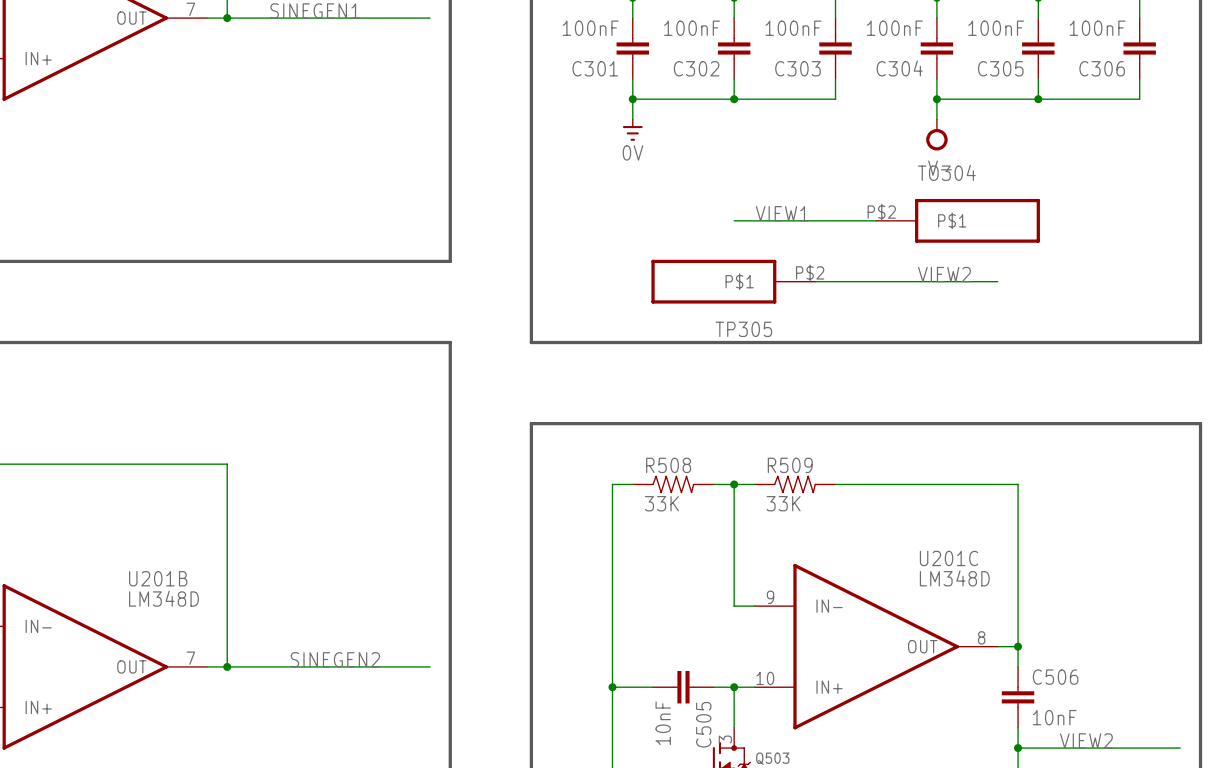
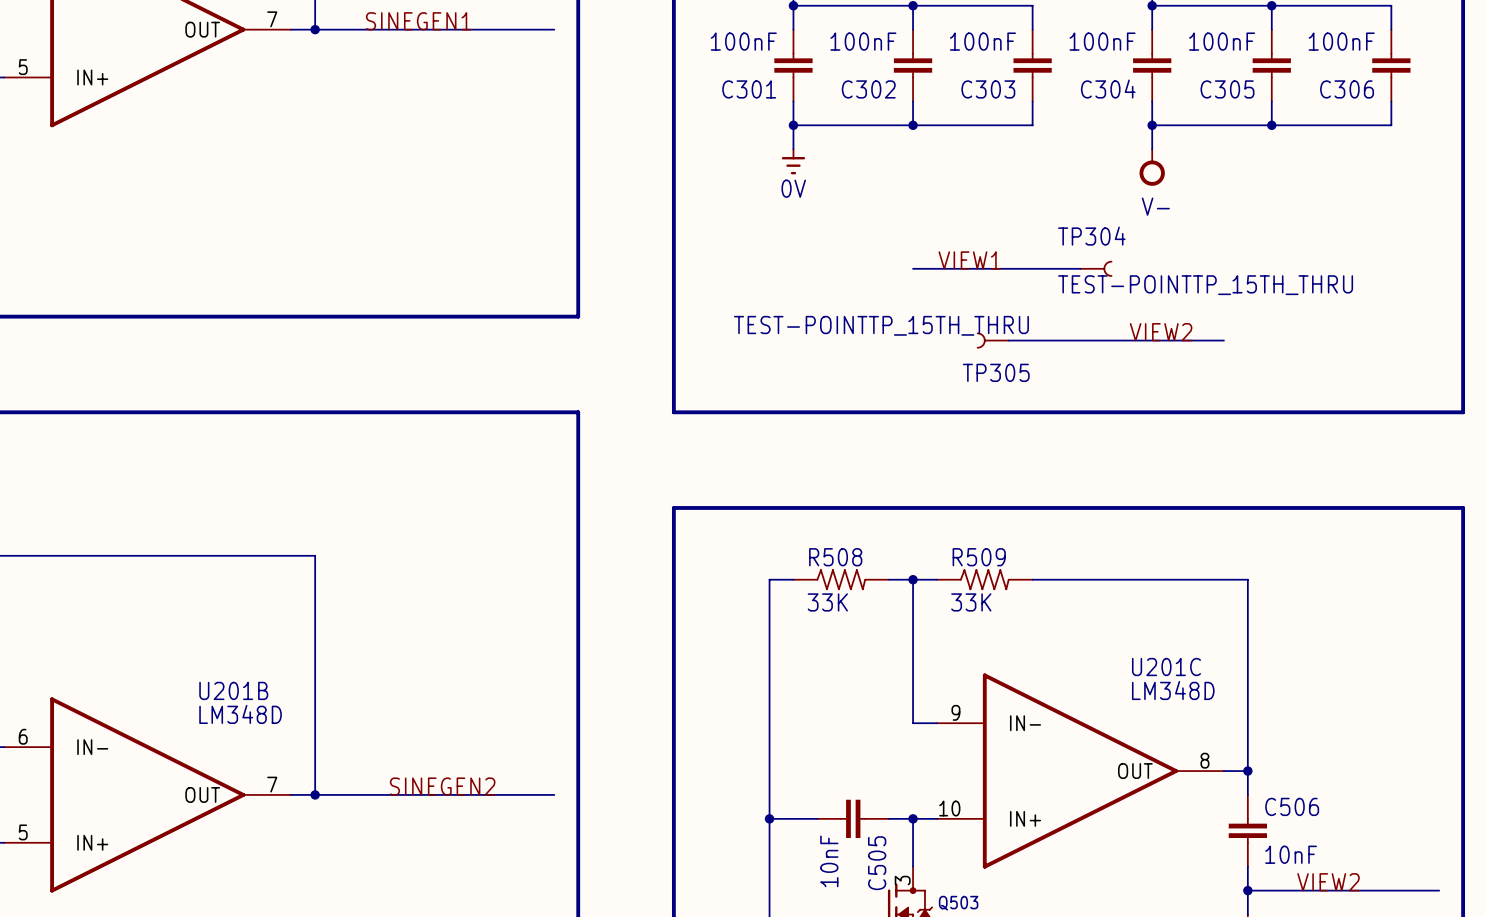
TP304: none -> TEST-POINTTP_15TH_THRU (1095, 268)
TO304: (958, 220) -> none
TP305 symbol: [651, 259, 816, 304] -> [976, 332, 1010, 349]
TP305 value: none -> TEST-POINTTP_15TH_THRU (881, 325)
TP305 name position: TP305 (743, 329) -> TP305 (996, 372)

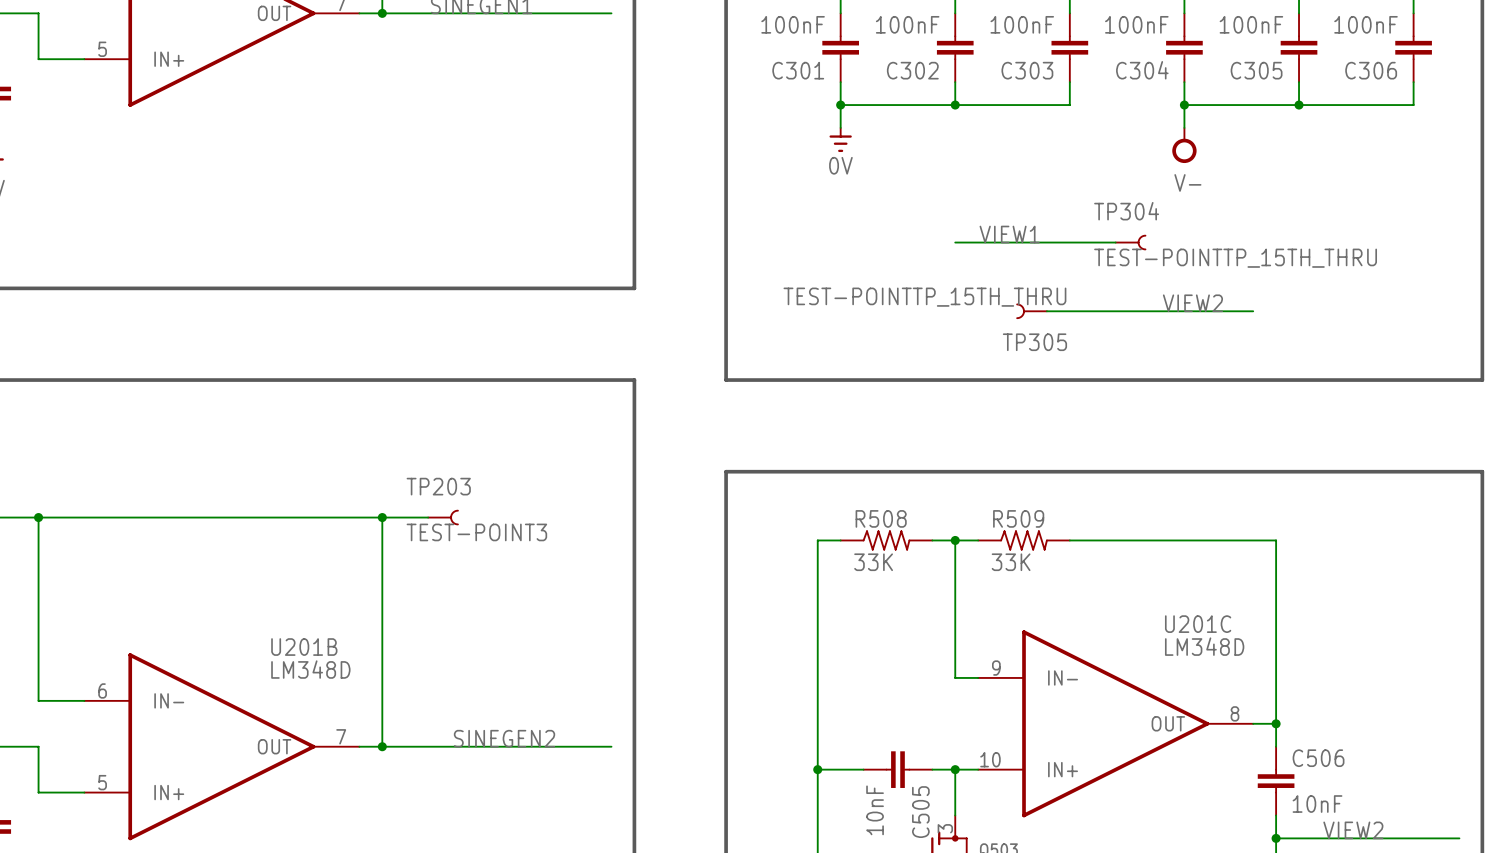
wire: none -> (382, 517) (428, 517)
junction: none -> (382, 517)
TP203: none -> TEST-POINT3 (443, 517)

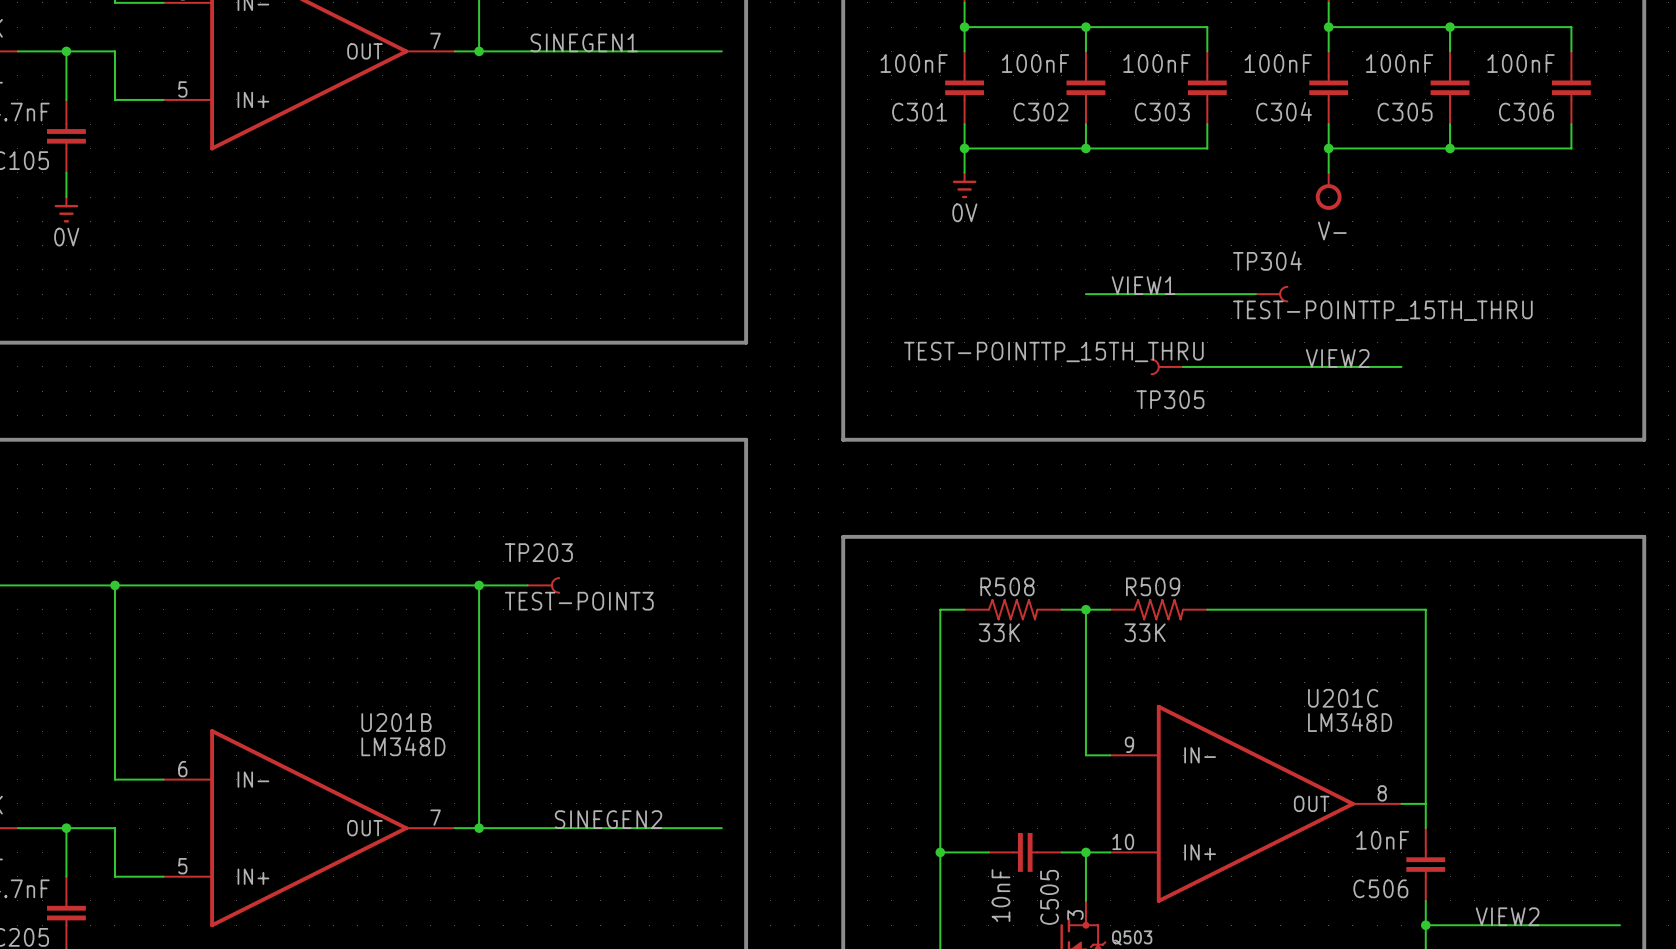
junction: (1276, 723) -> none
C506 name position: C506 (1318, 758) -> C506 (1380, 888)
C506 value position: 10nF (1317, 804) -> 10nF (1382, 840)

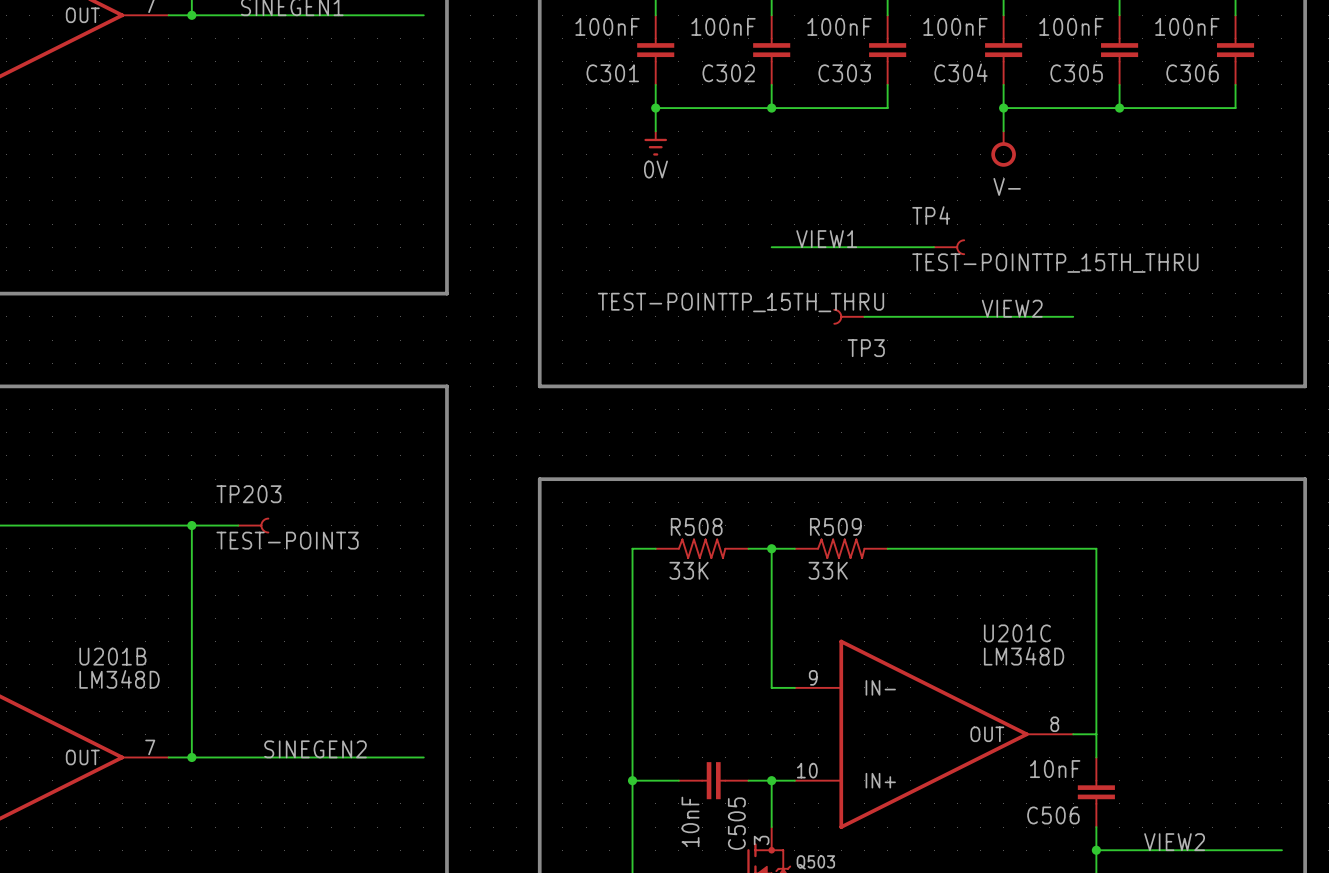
TP304 name: TP304 (1267, 260) -> TP4 (931, 215)
TP305 name: TP305 (1170, 399) -> TP3 (866, 348)

